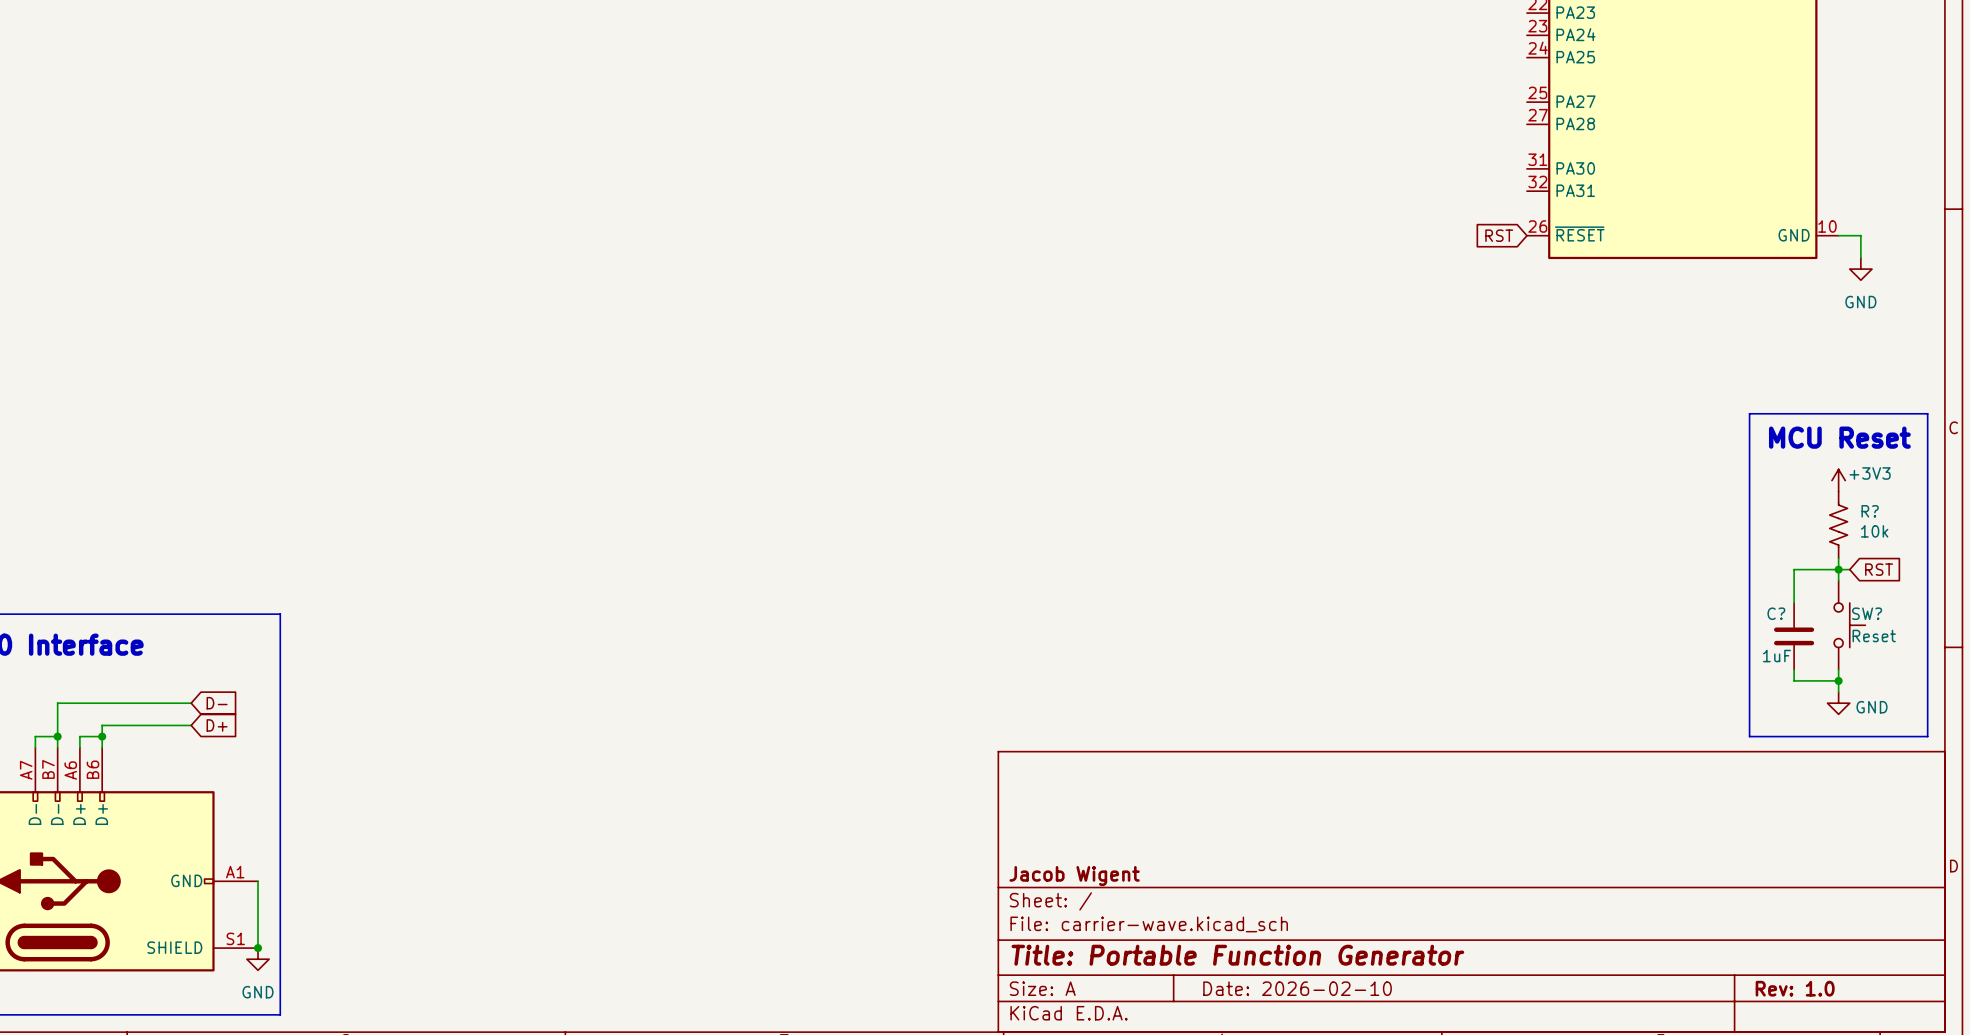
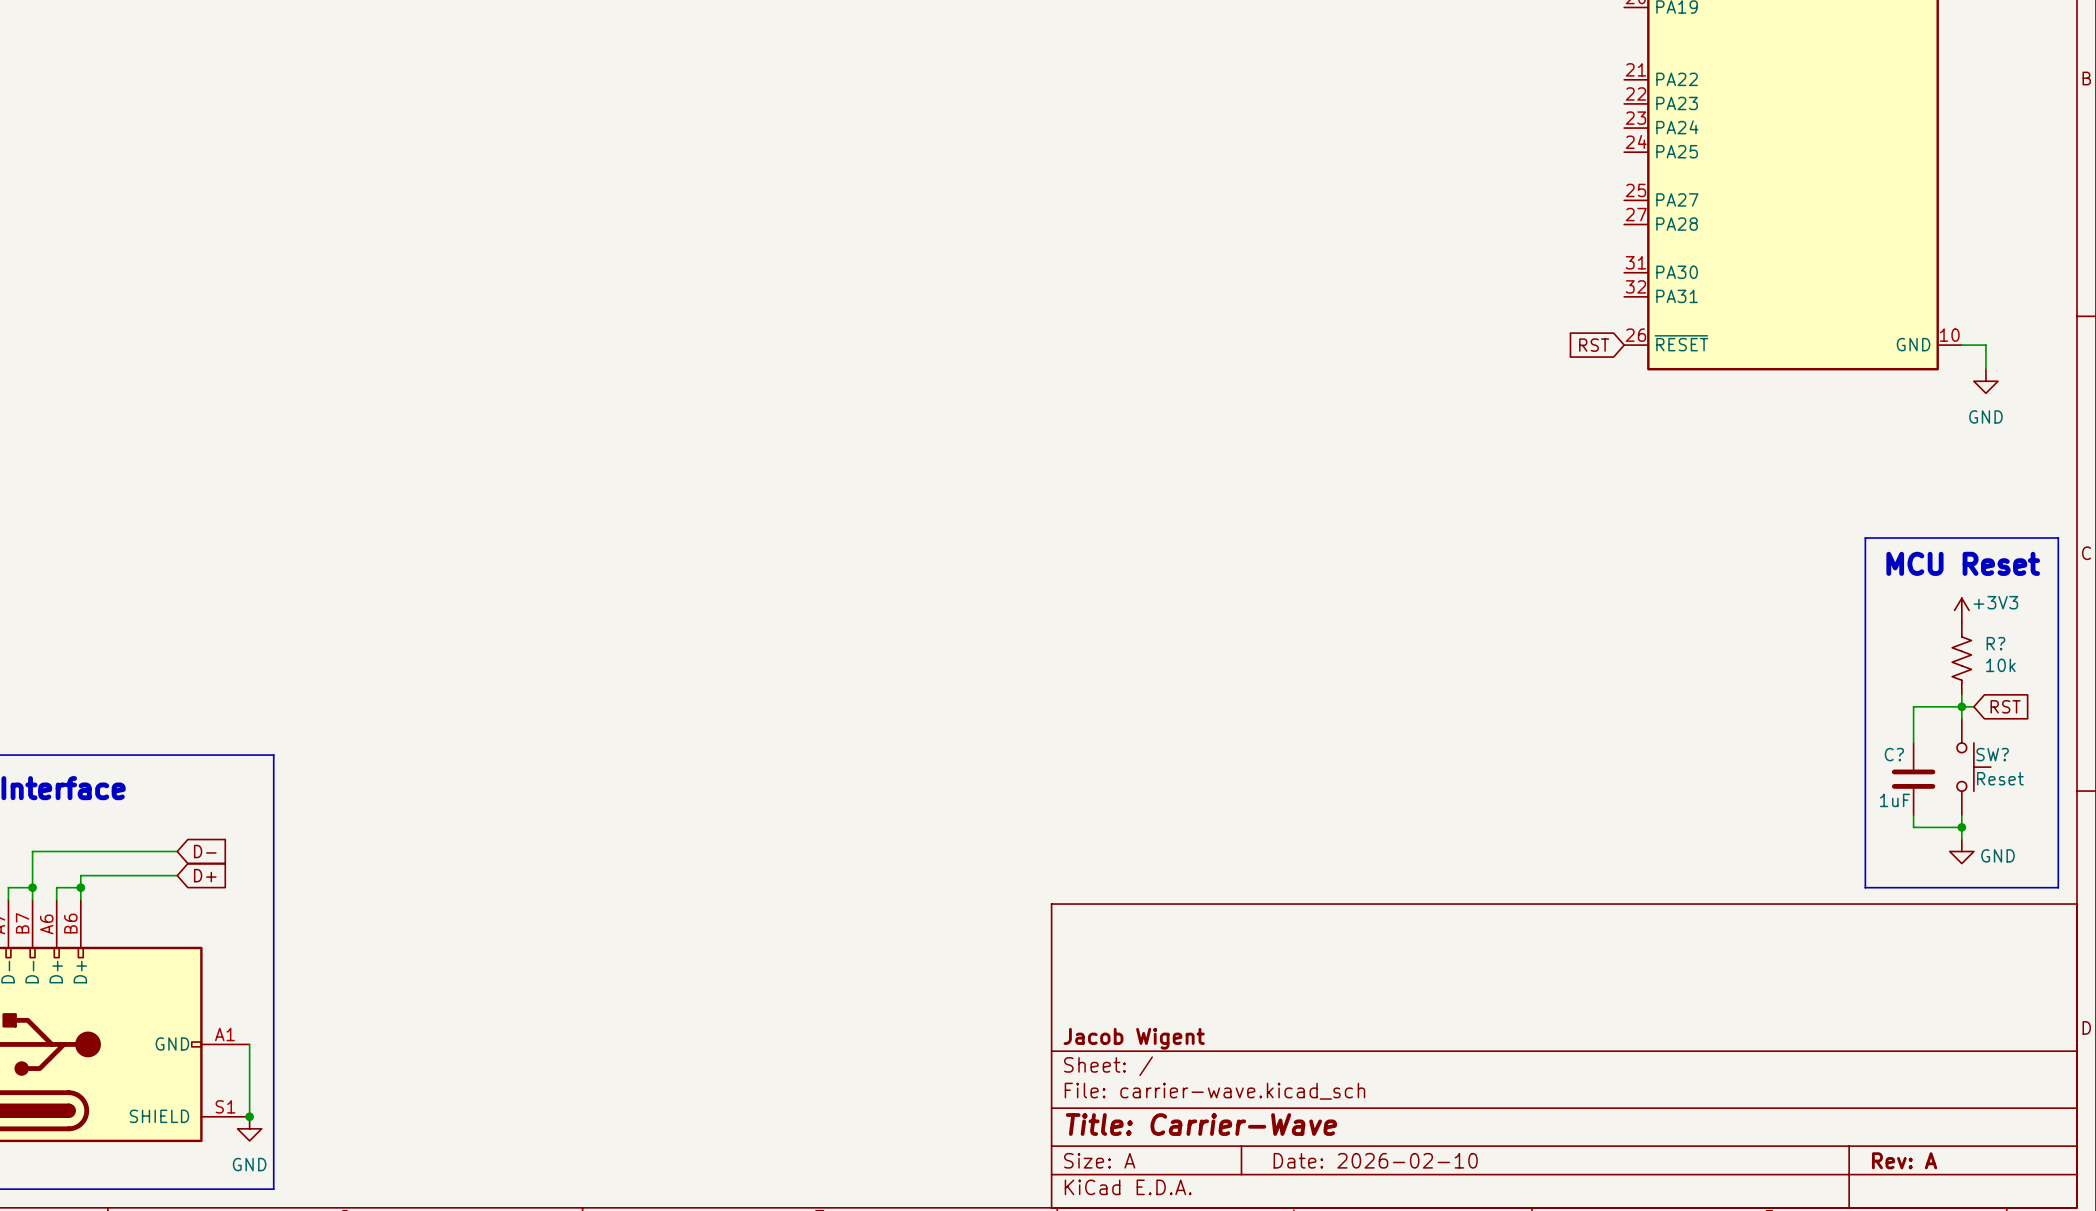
title block: Title: Portable Function Generator (1237, 955) -> Title: Carrier-Wave (1201, 1124)
title block: Rev: 1.0 (1795, 988) -> Rev: A (1904, 1160)

